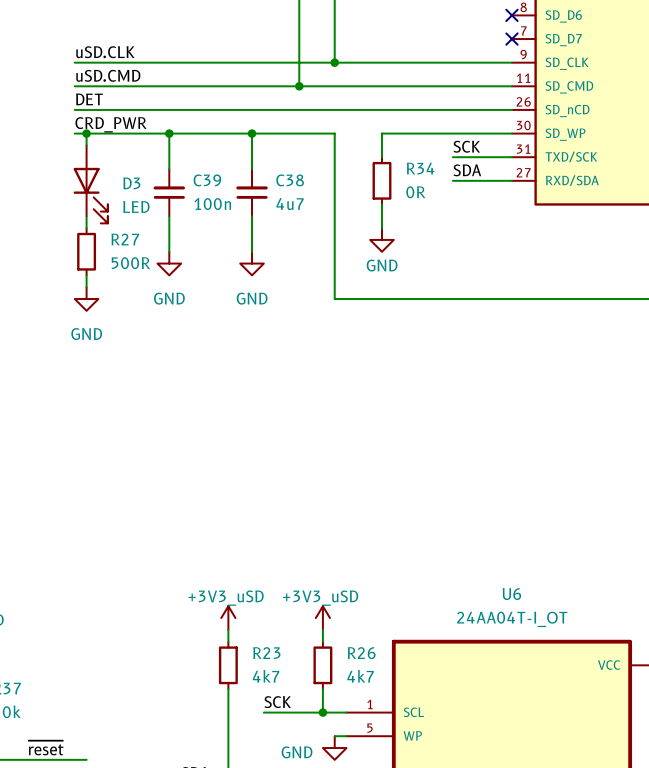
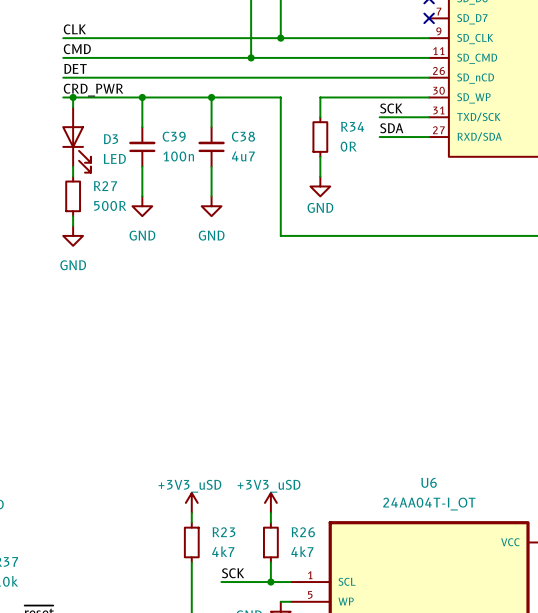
label: uSD.CLK (105, 52) -> CLK (74, 29)
label: uSD.CMD (108, 75) -> CMD (77, 49)

